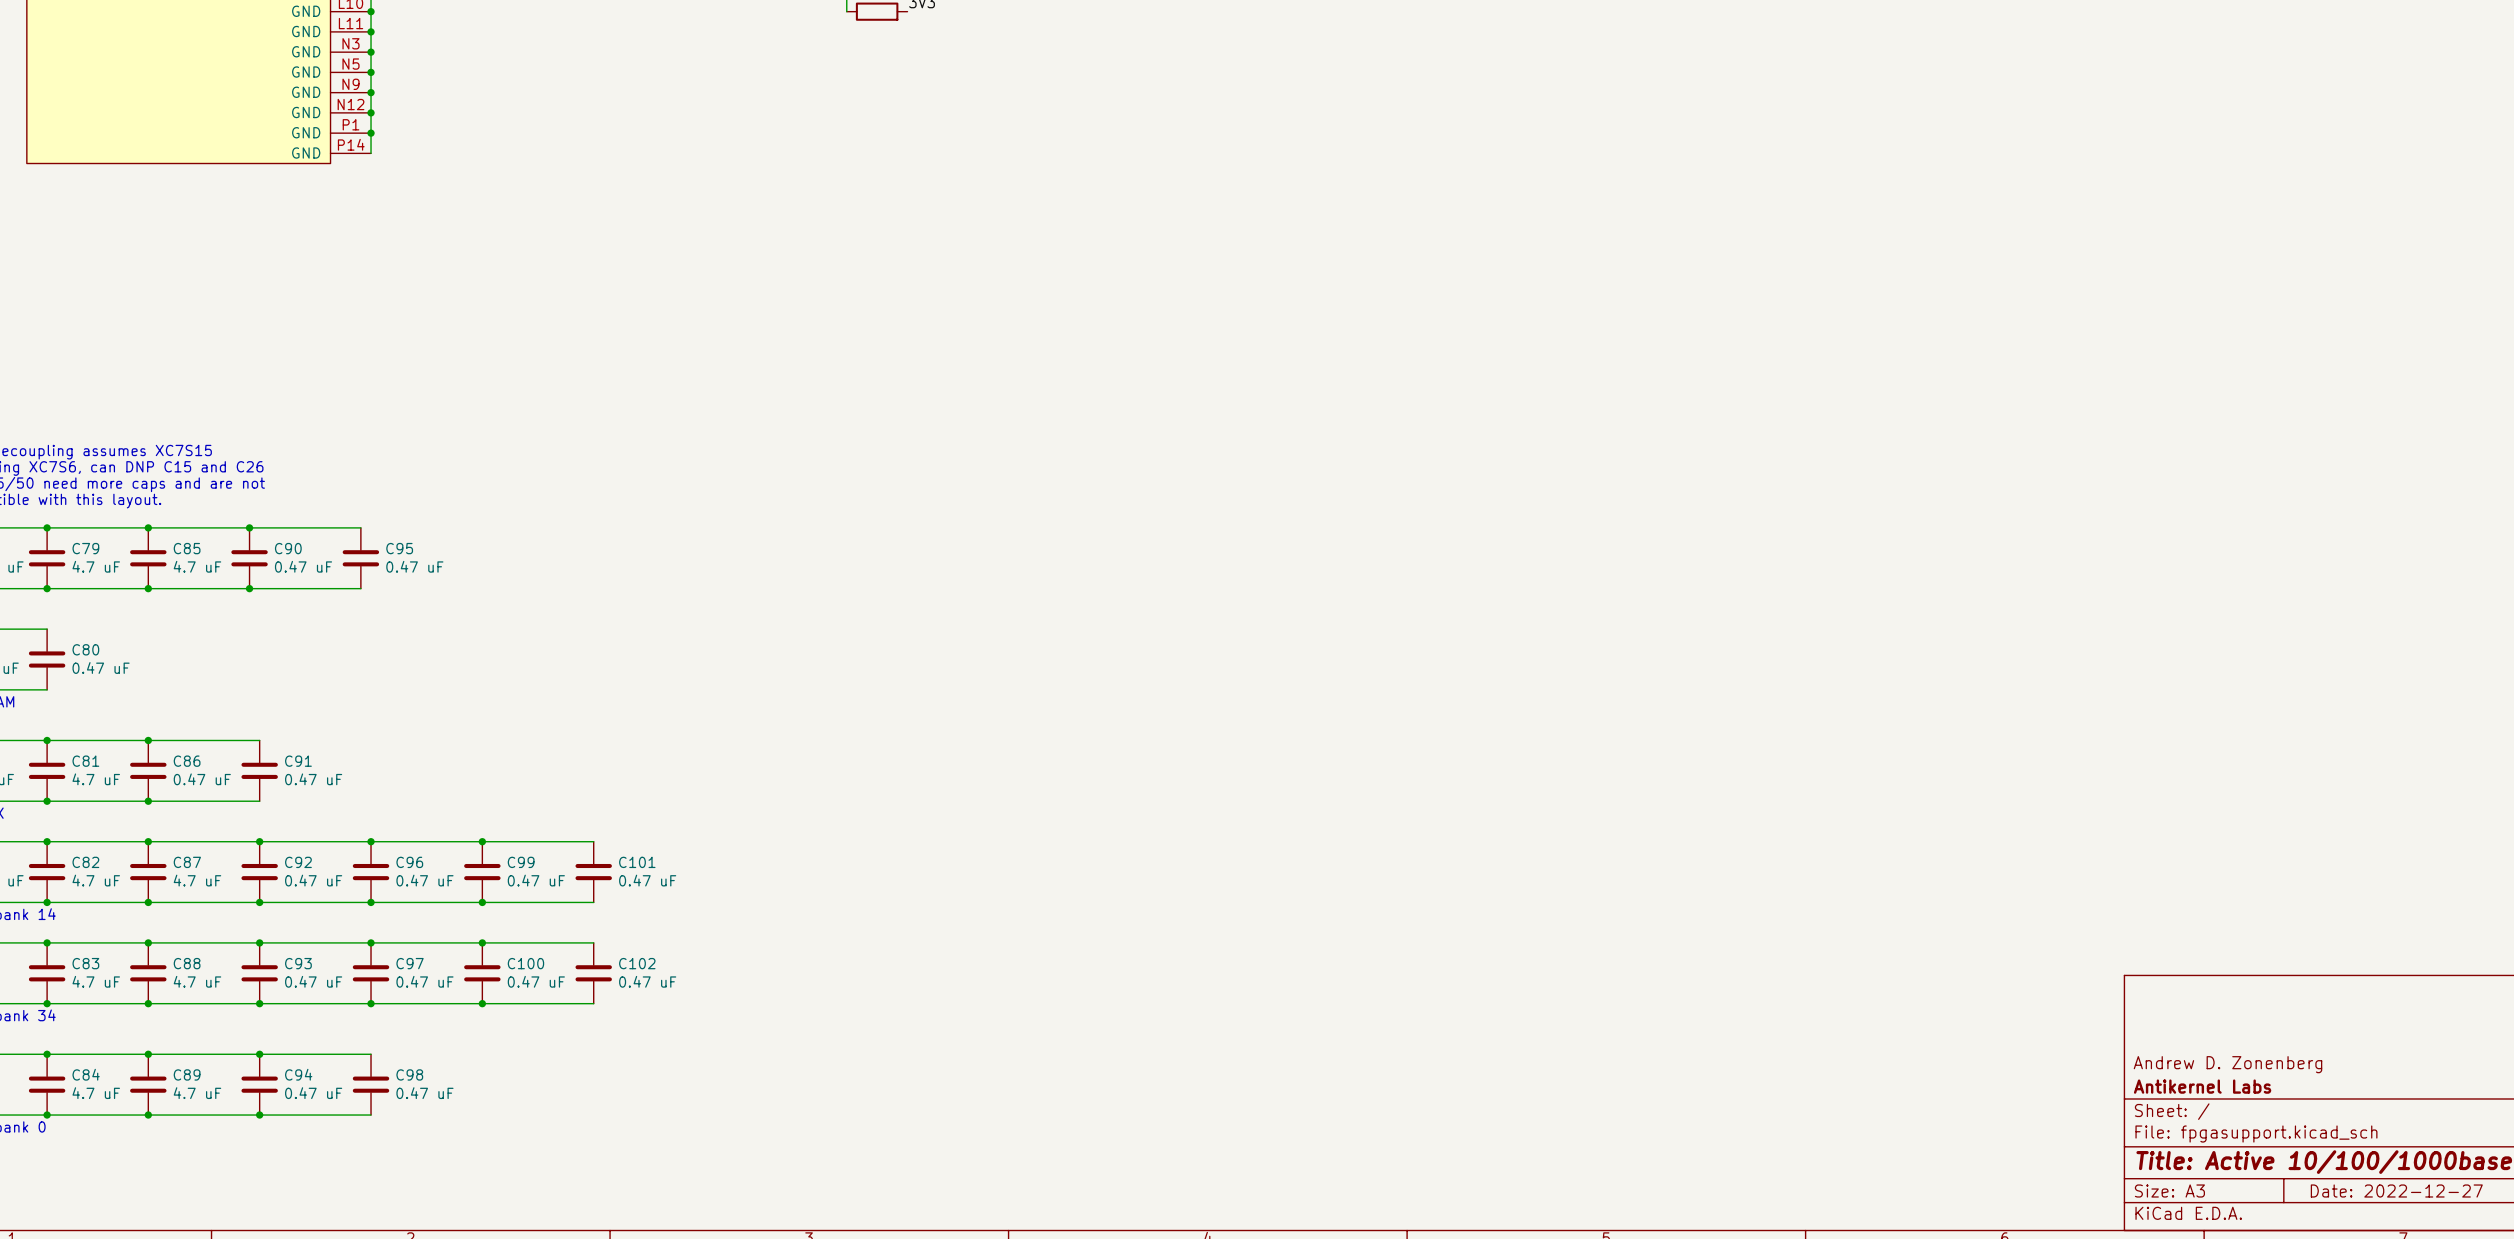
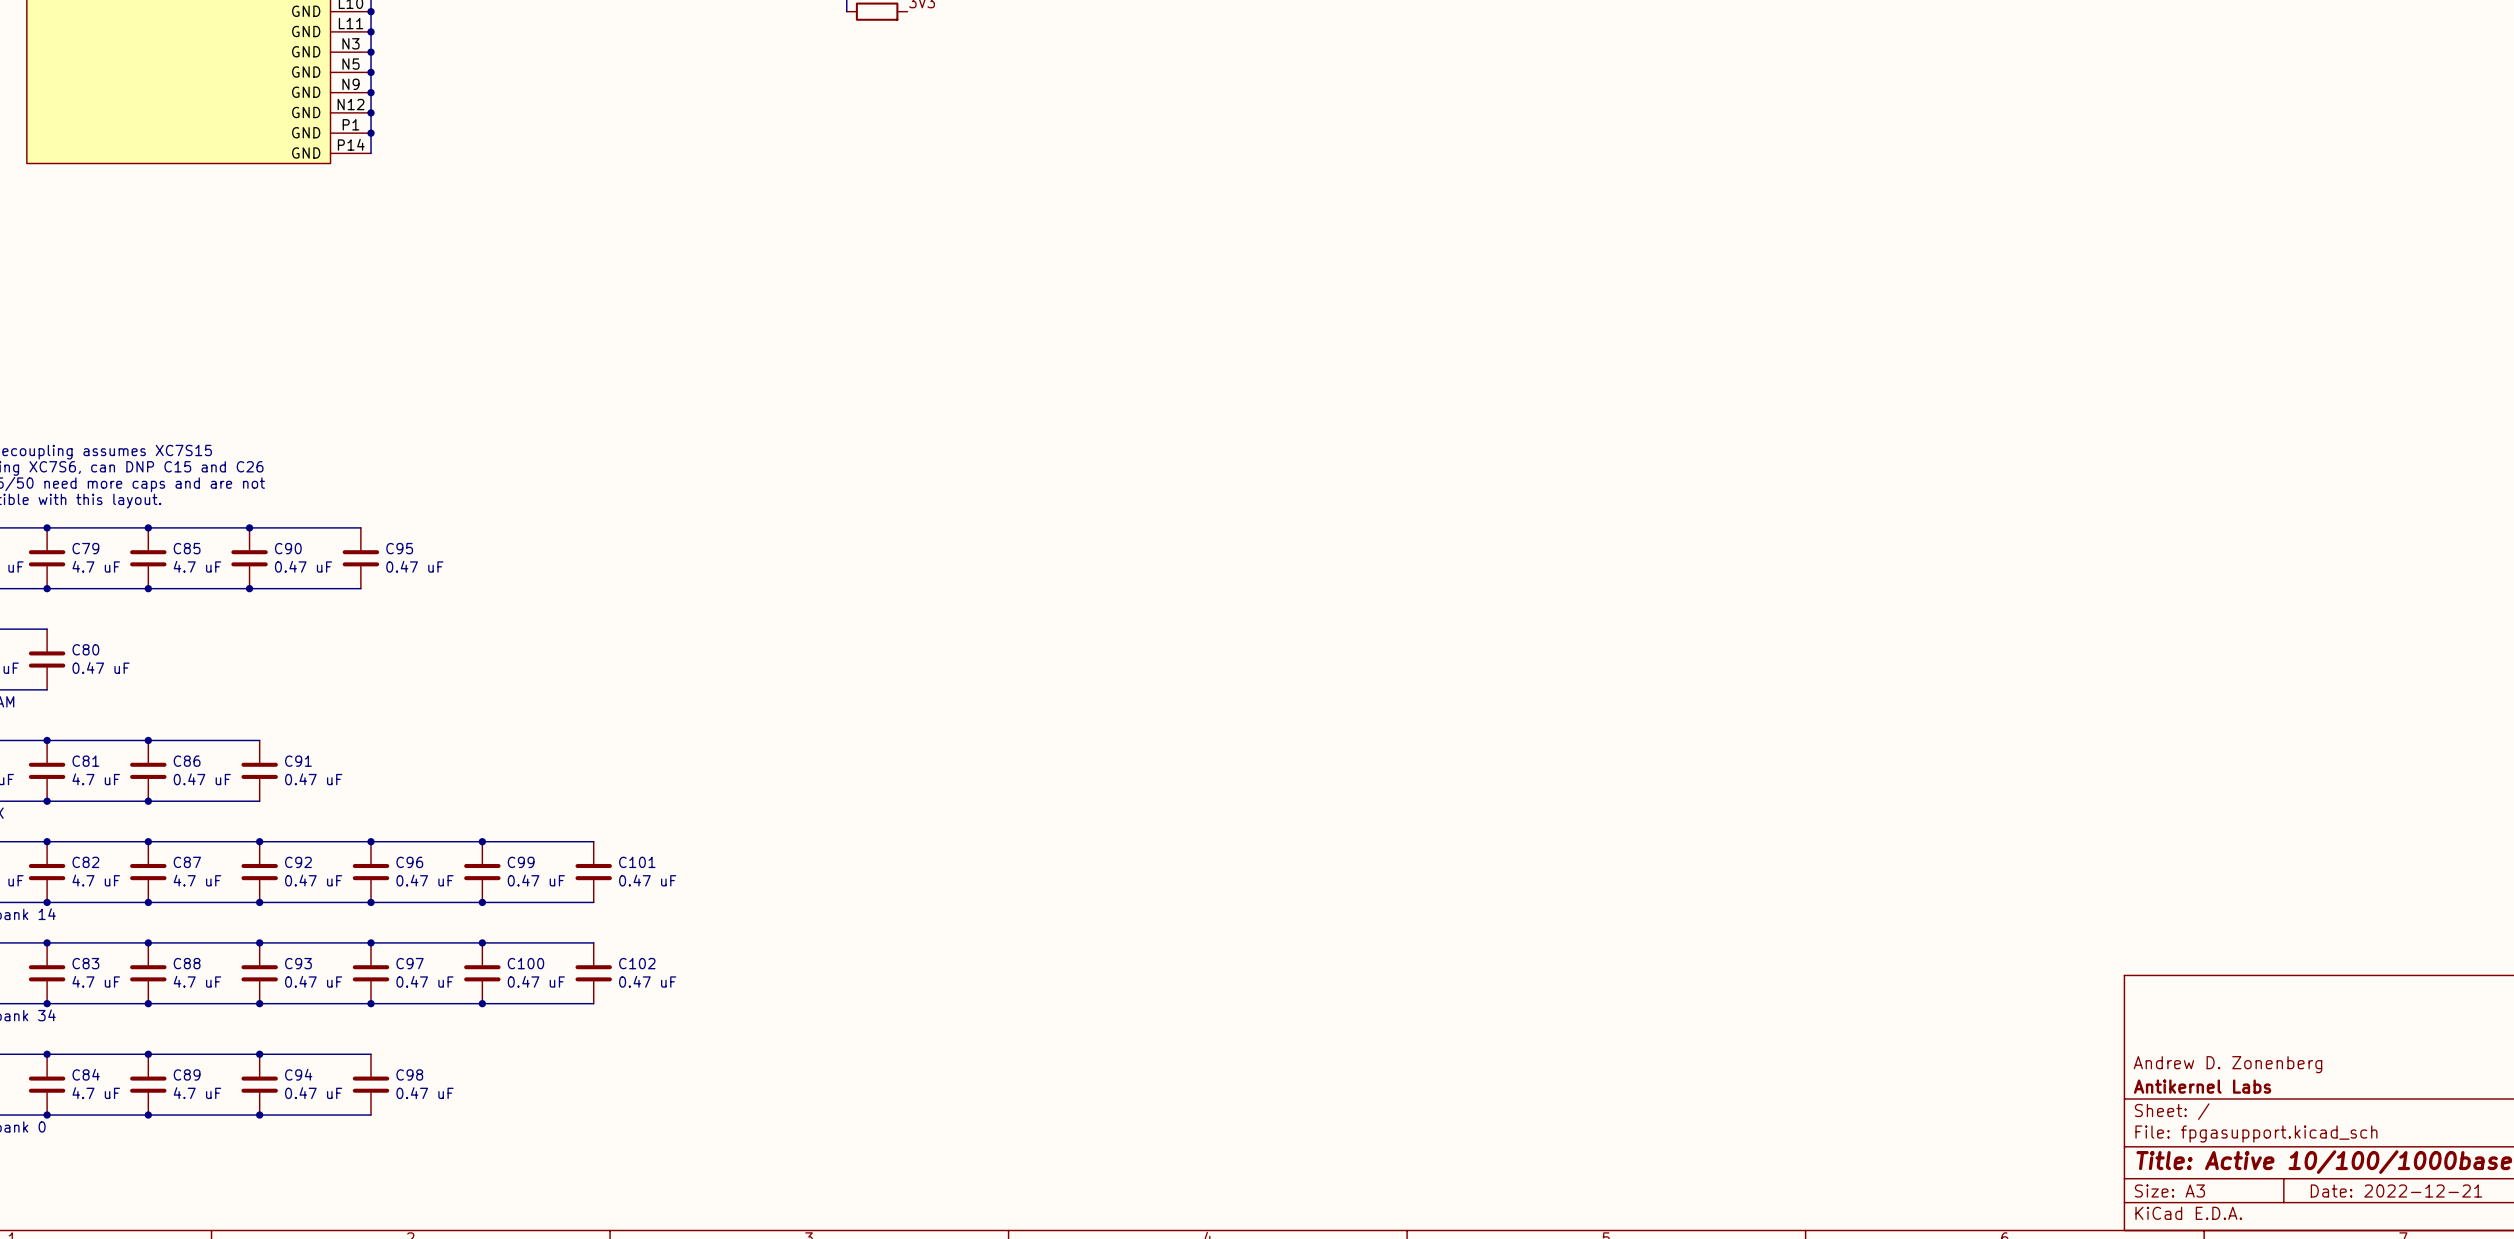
title block: Date: 2022-12-27 (2396, 1191) -> Date: 2022-12-21 (2396, 1191)

